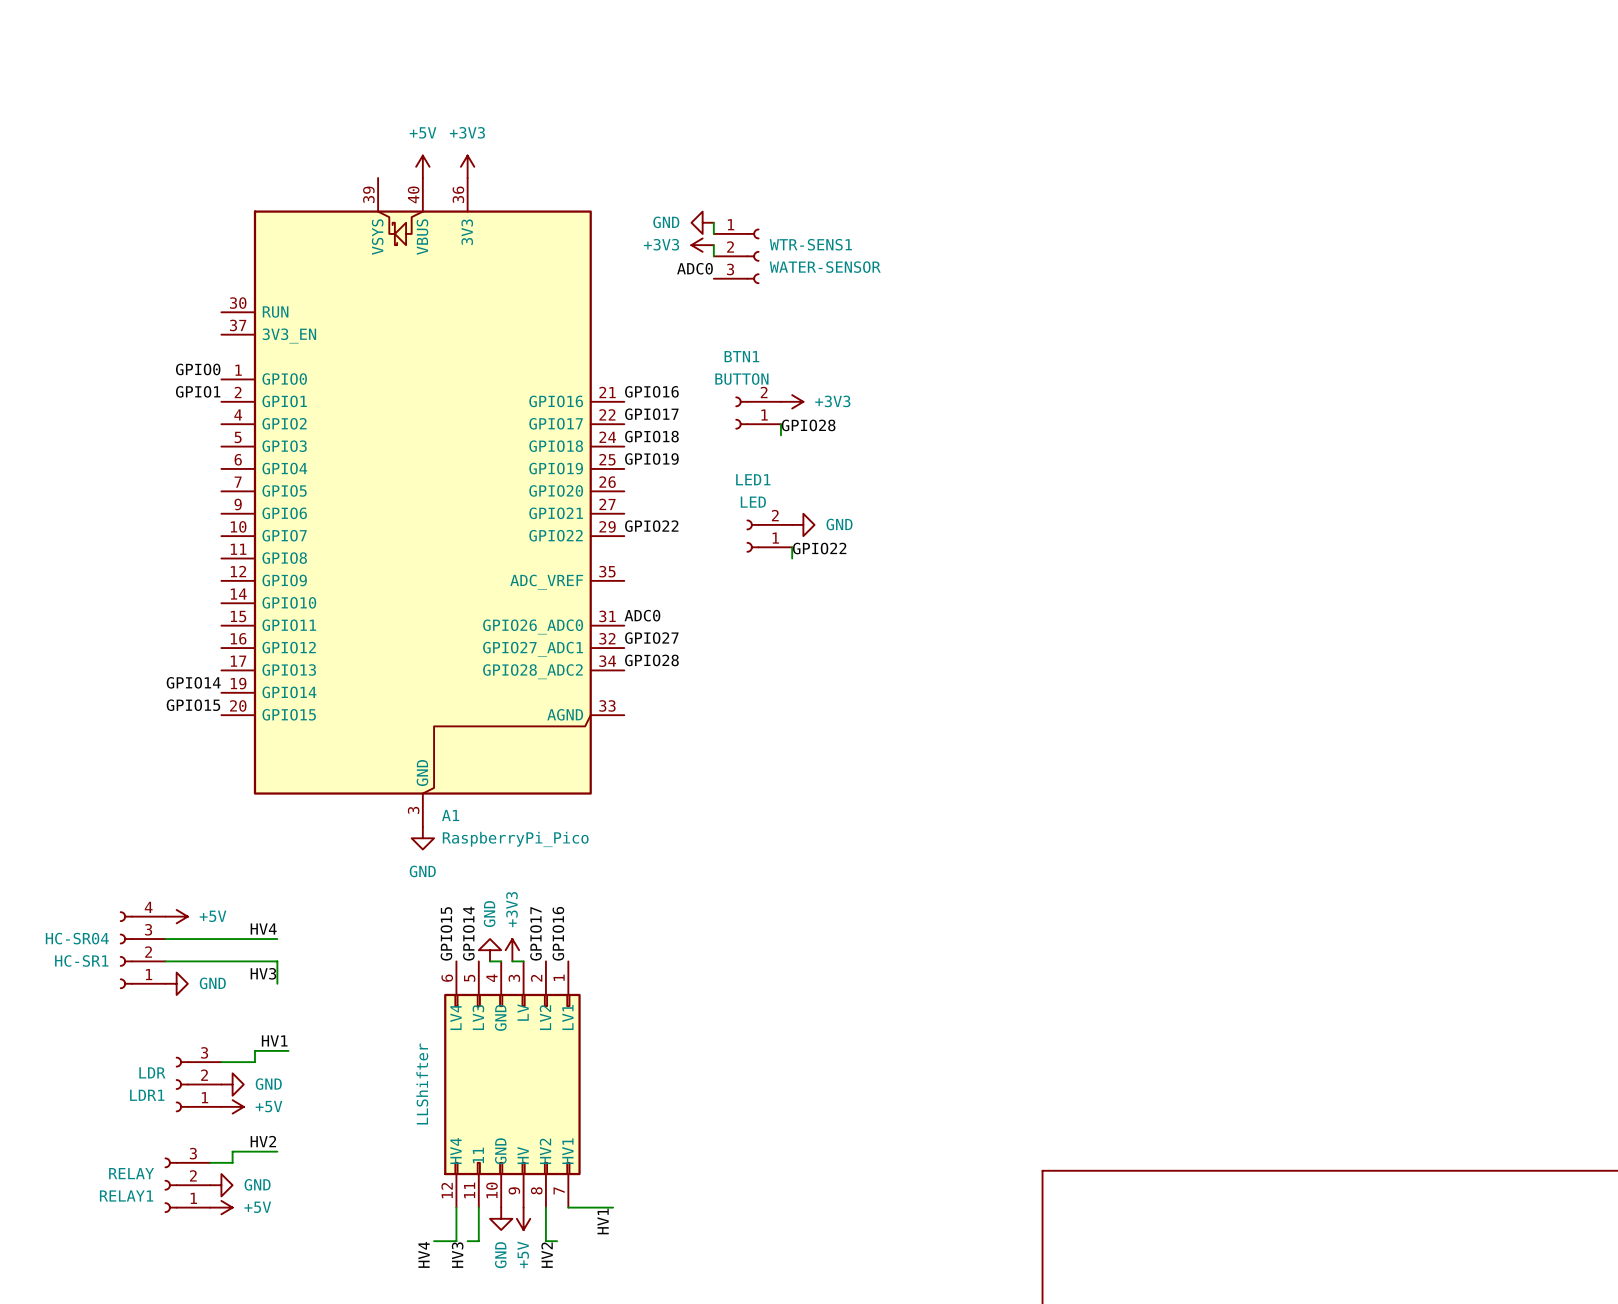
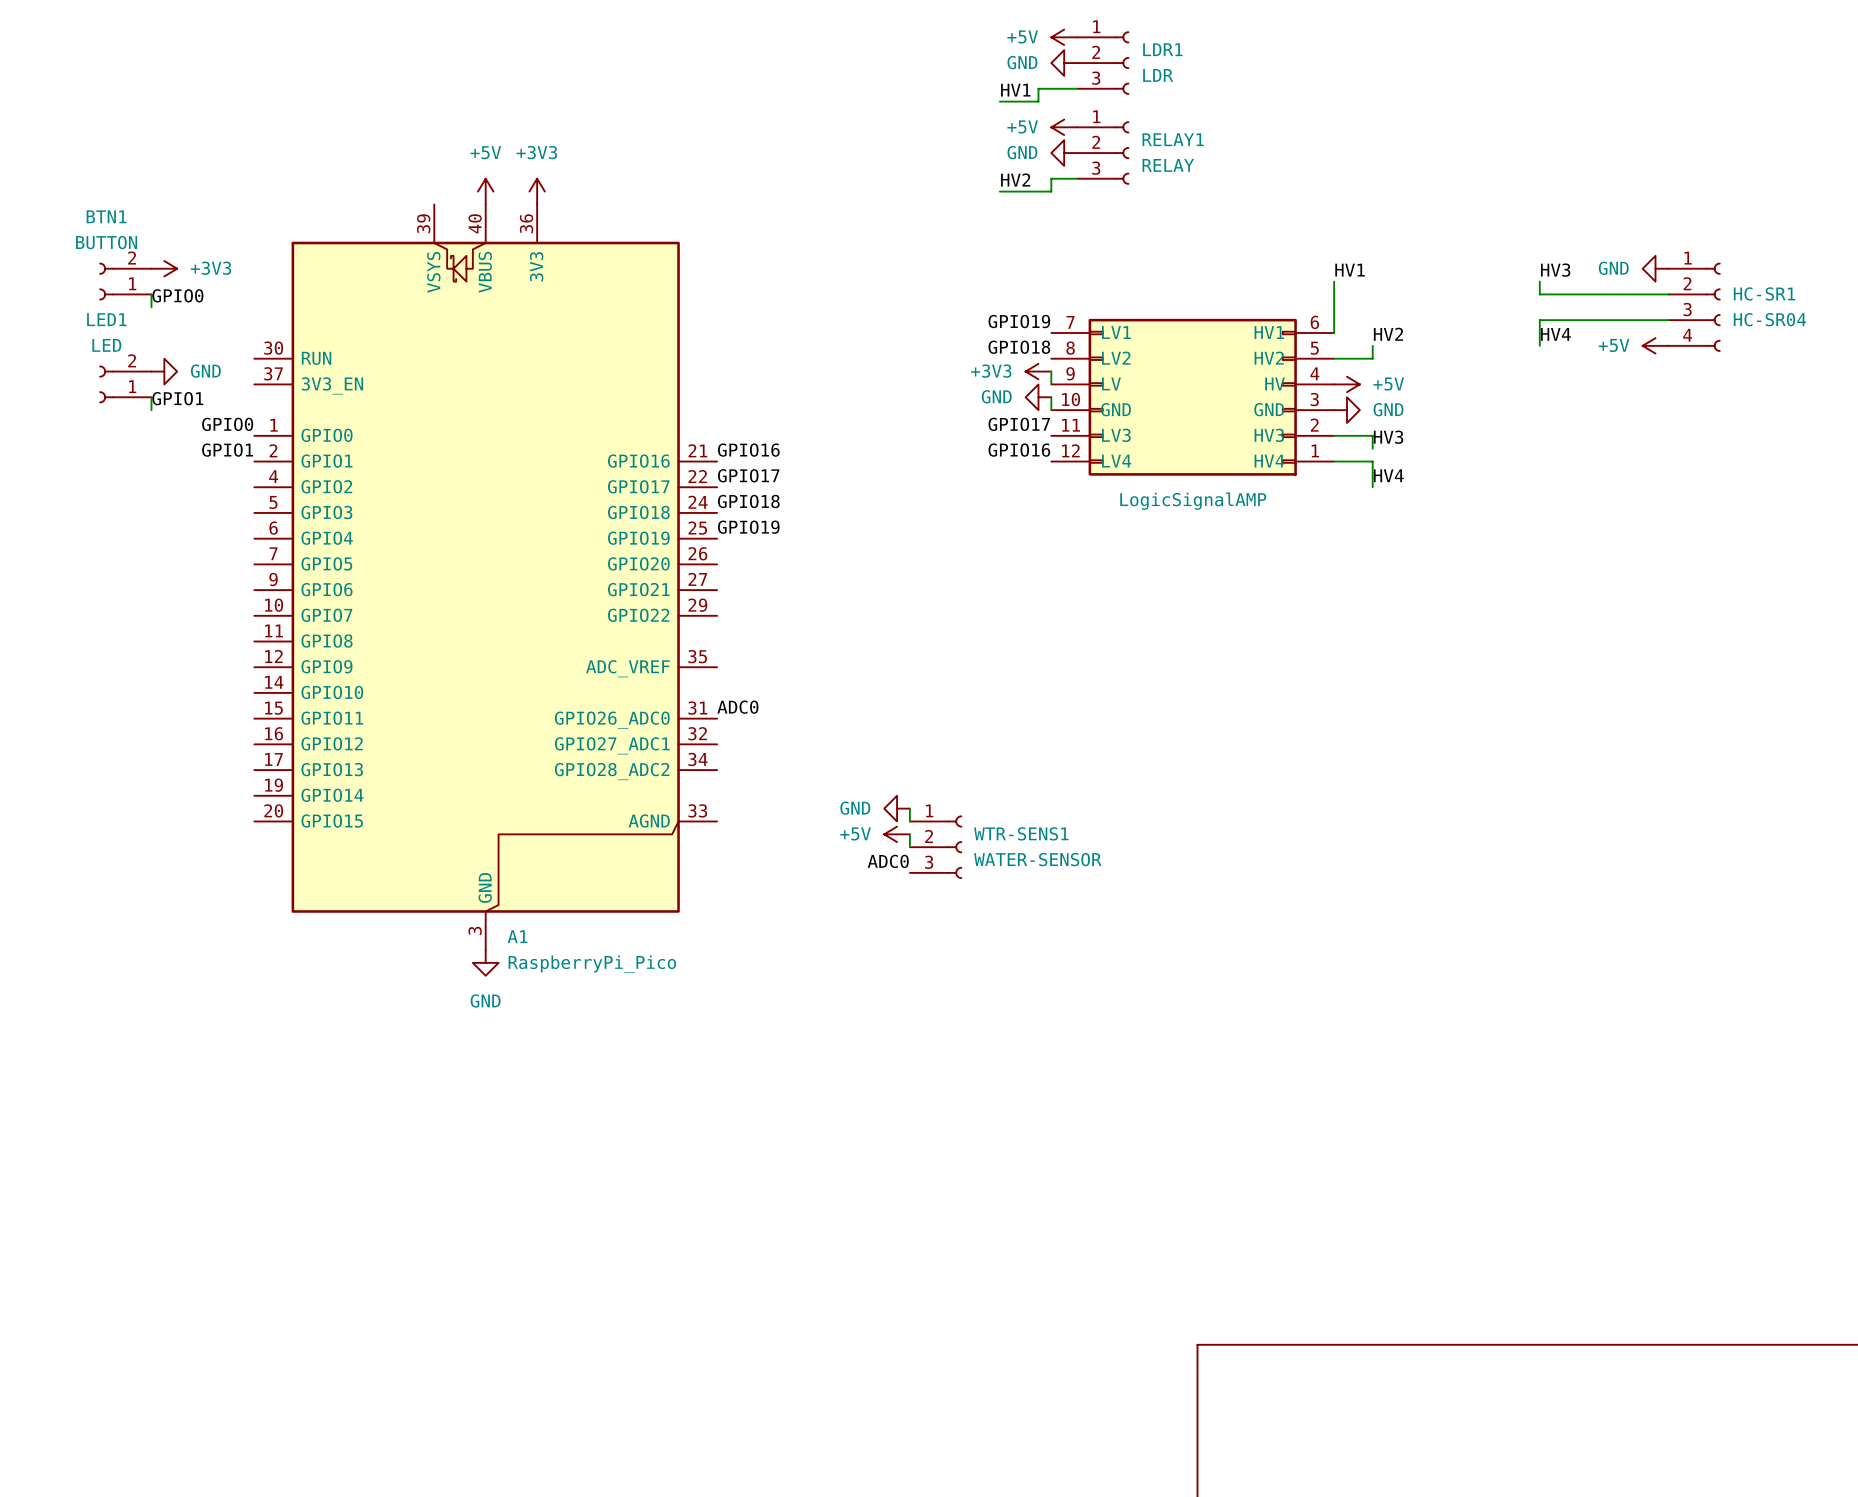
power symbol: none -> +5V (1064, 37)
power symbol: none -> GND (1064, 63)
wire: none -> (1077, 88) (1038, 88) (1038, 101) (999, 101)
label: none -> HV1 (1015, 90)
power symbol: none -> +5V (1064, 127)
power symbol: none -> GND (1064, 153)
wire: none -> (1077, 178) (1051, 178) (1051, 191) (999, 191)
label: none -> HV2 (1015, 180)
power symbol: GND (702, 222) -> none
wire: (713, 222) (713, 233) -> none
power symbol: none -> +3V3 (164, 268)
power symbol: none -> GND (1655, 268)
label: none -> HV1 (1350, 270)
label: none -> HV3 (1555, 270)
power symbol: +3V3 (702, 245) -> none
wire: (713, 245) (713, 256) -> (1051, 371) (1051, 384)
wire: none -> (1334, 281) (1334, 333)
wire: none -> (1539, 281) (1539, 294) (1668, 294)
wire: none -> (151, 294) (151, 307)
WTR-SENS1 position: (736, 256) -> (936, 847)
label: none -> GPIO0 (177, 295)
label: ADC0 (694, 268) -> none
wire: none -> (1668, 320) (1539, 320) (1539, 345)
label: none -> GPIO19 (1019, 321)
label: none -> HV2 (1388, 334)
label: none -> HV4 (1555, 334)
wire: none -> (1372, 345) (1372, 358) (1334, 358)
power symbol: none -> +5V (1655, 345)
label: none -> GPIO18 (1019, 347)
power symbol: none -> GND (164, 371)
power symbol: none -> +3V3 (1038, 371)
power symbol: none -> +5V (1346, 384)
wire: none -> (151, 397) (151, 410)
power symbol: none -> GND (1038, 397)
part: none -> LogicSignalAMP (1192, 397)
label: none -> GPIO1 (177, 398)
power symbol: none -> GND (1346, 410)
label: none -> GPIO17 (1019, 424)
wire: none -> (1334, 435) (1372, 435) (1372, 448)
label: none -> HV3 (1388, 437)
label: none -> GPIO16 (1019, 450)
power symbol: +3V3 (792, 401) -> none
wire: none -> (1334, 461) (1372, 461) (1372, 487)
BTN1 position: (758, 413) -> (125, 281)
label: none -> HV4 (1388, 475)
wire: (780, 424) (780, 435) -> (1051, 397) (1051, 410)
label: GPIO28 (808, 425) -> none
power symbol: GND (803, 524) -> none
label: GPIO22 (651, 526) -> none
LED1 position: (769, 536) -> (125, 384)
wire: (792, 547) (792, 558) -> (909, 808) (909, 821)
label: GPIO22 (819, 548) -> none
label: GPIO27 (651, 638) -> none
label: GPIO28 (651, 660) -> none
label: GPIO14 (193, 682) -> none
power symbol: none -> GND (897, 808)
label: GPIO15 (193, 705) -> none
power symbol: none -> +5V (897, 834)
wire: none -> (909, 834) (909, 847)
label: none -> ADC0 (888, 861)
power symbol: +5V (176, 916) -> none
label: HV4 (263, 929) -> none
label: GPIO15 (446, 933) -> none
label: GPIO14 (468, 933) -> none
label: GPIO17 (535, 933) -> none
label: GPIO16 (558, 933) -> none
wire: (165, 939) (277, 939) -> none
HC-SR1 rotation: 0° (126, 950) -> 180° (1713, 307)
HC-SR1 position: (142, 950) -> (1694, 307)
power symbol: GND (490, 950) -> none
power symbol: +3V3 (512, 950) -> none
wire: (165, 961) (277, 961) (277, 983) -> none
wire: (490, 961) (501, 961) -> none
wire: (512, 961) (523, 961) -> none
label: HV3 (263, 973) -> none
power symbol: GND (176, 983) -> none
label: HV1 (274, 1040) -> none
wire: (288, 1050) (254, 1050) (254, 1062) (221, 1062) -> none
LDR1 rotation: 0° (182, 1084) -> 180° (1122, 63)
LDR1 position: (198, 1084) -> (1103, 63)
power symbol: GND (232, 1084) -> none
part: LLShifter (512, 1084) -> none
power symbol: +5V (232, 1106) -> none
label: HV2 (263, 1141) -> none
wire: (277, 1151) (232, 1151) (232, 1162) (210, 1162) -> none
RELAY1 rotation: 0° (171, 1185) -> 180° (1122, 153)
RELAY1 position: (187, 1185) -> (1103, 153)
power symbol: GND (221, 1185) -> none
power symbol: +5V (221, 1207) -> none
wire: (456, 1207) (456, 1241) (434, 1241) -> none
wire: (478, 1207) (478, 1241) (467, 1241) -> none
wire: (545, 1207) (545, 1241) (557, 1241) -> none
wire: (568, 1207) (613, 1207) -> none
power symbol: GND (501, 1218) -> none
power symbol: +5V (523, 1218) -> none
label: HV1 (603, 1221) -> none
label: HV4 (424, 1254) -> none
label: HV3 (457, 1255) -> none
label: HV2 (547, 1255) -> none

